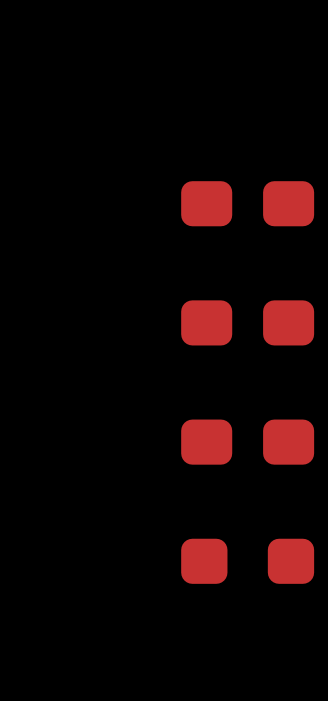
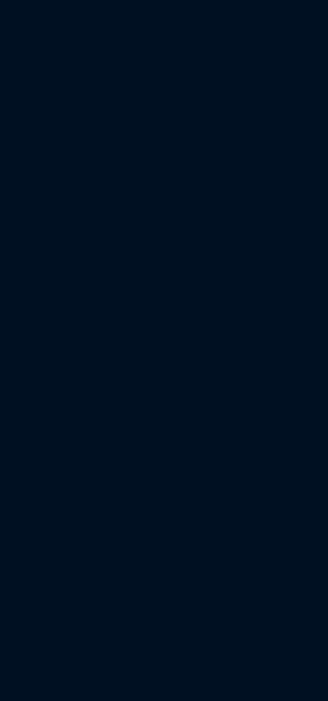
part: (247, 203) -> none
part: (247, 322) -> none
part: (247, 442) -> none
part: (247, 561) -> none

